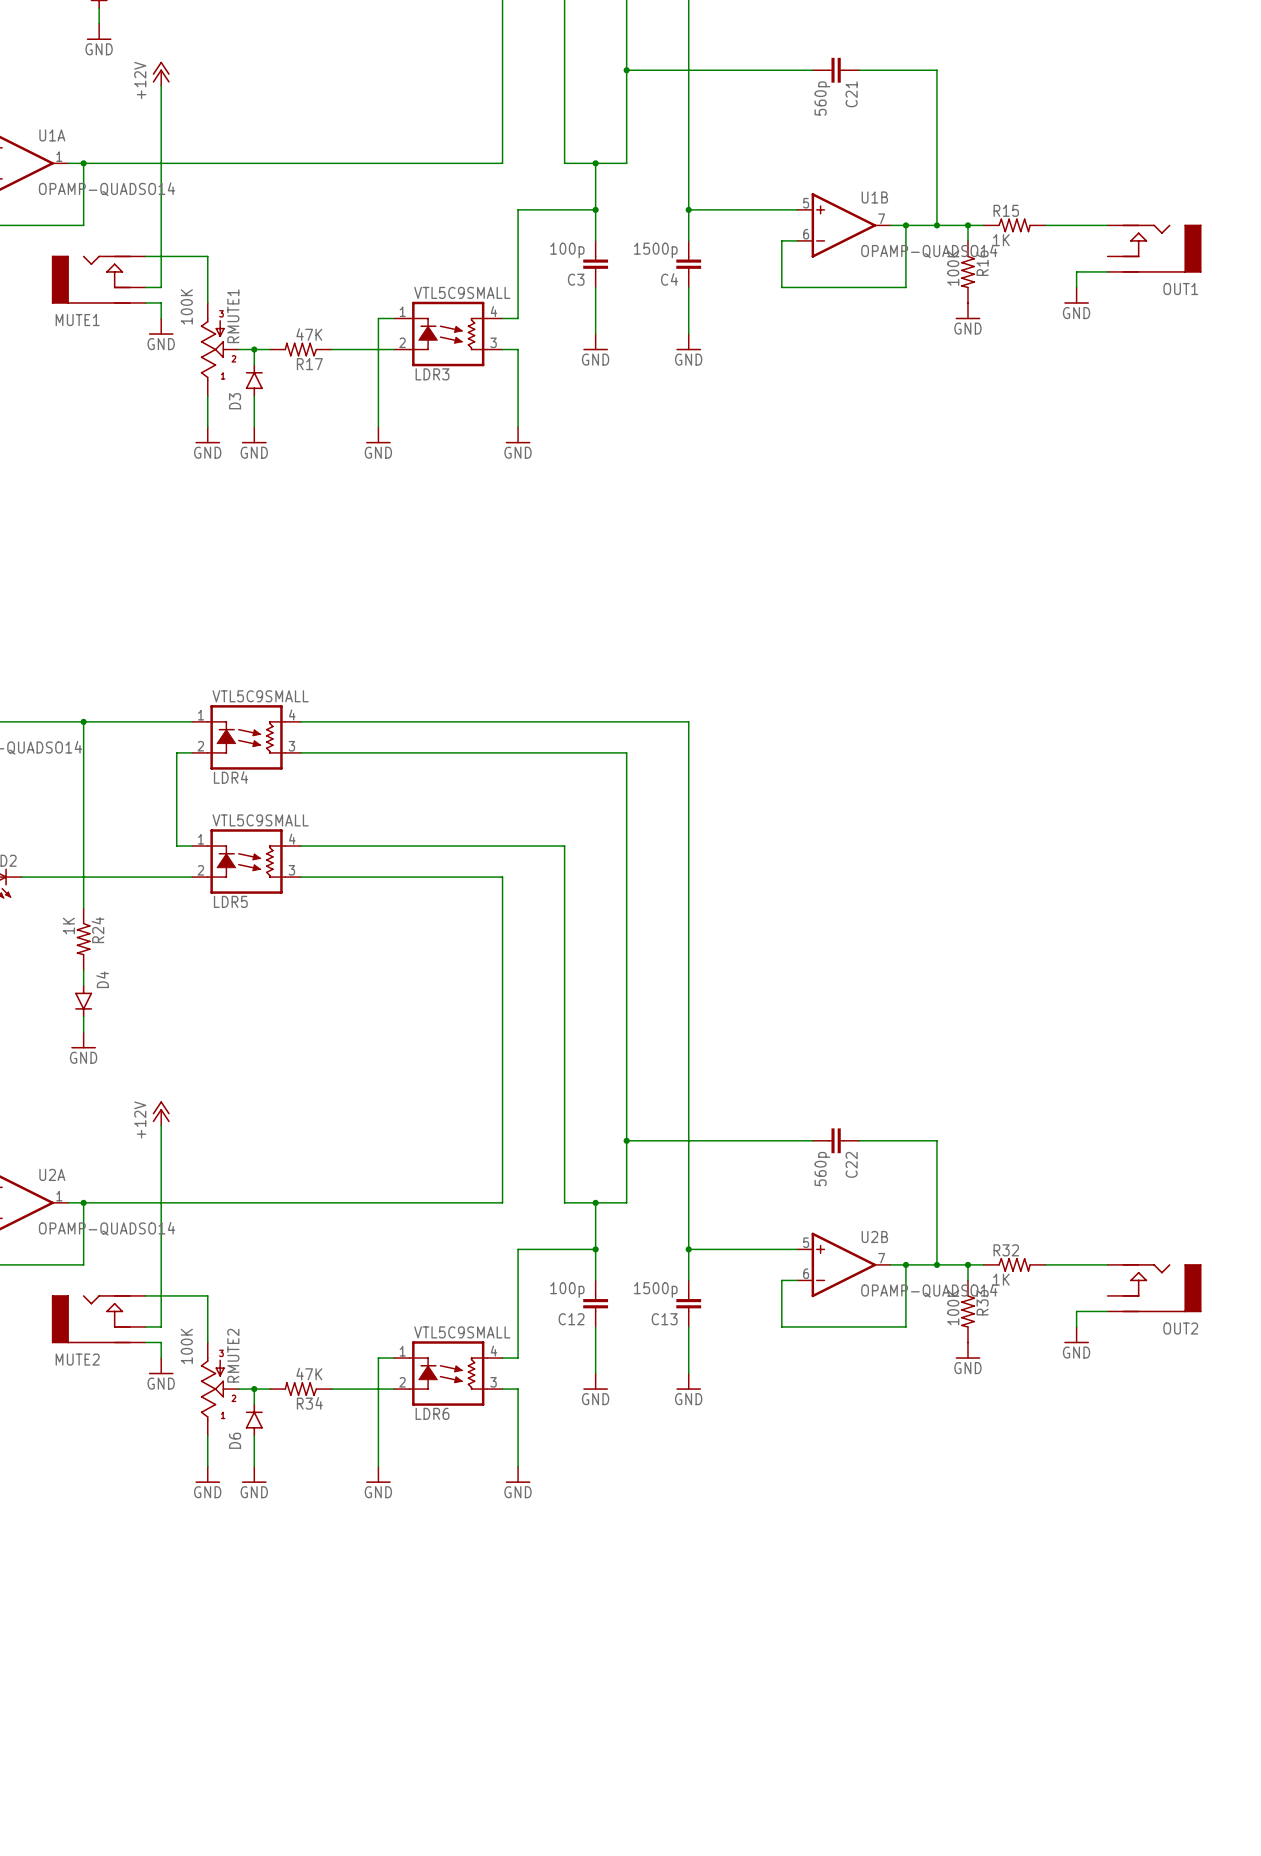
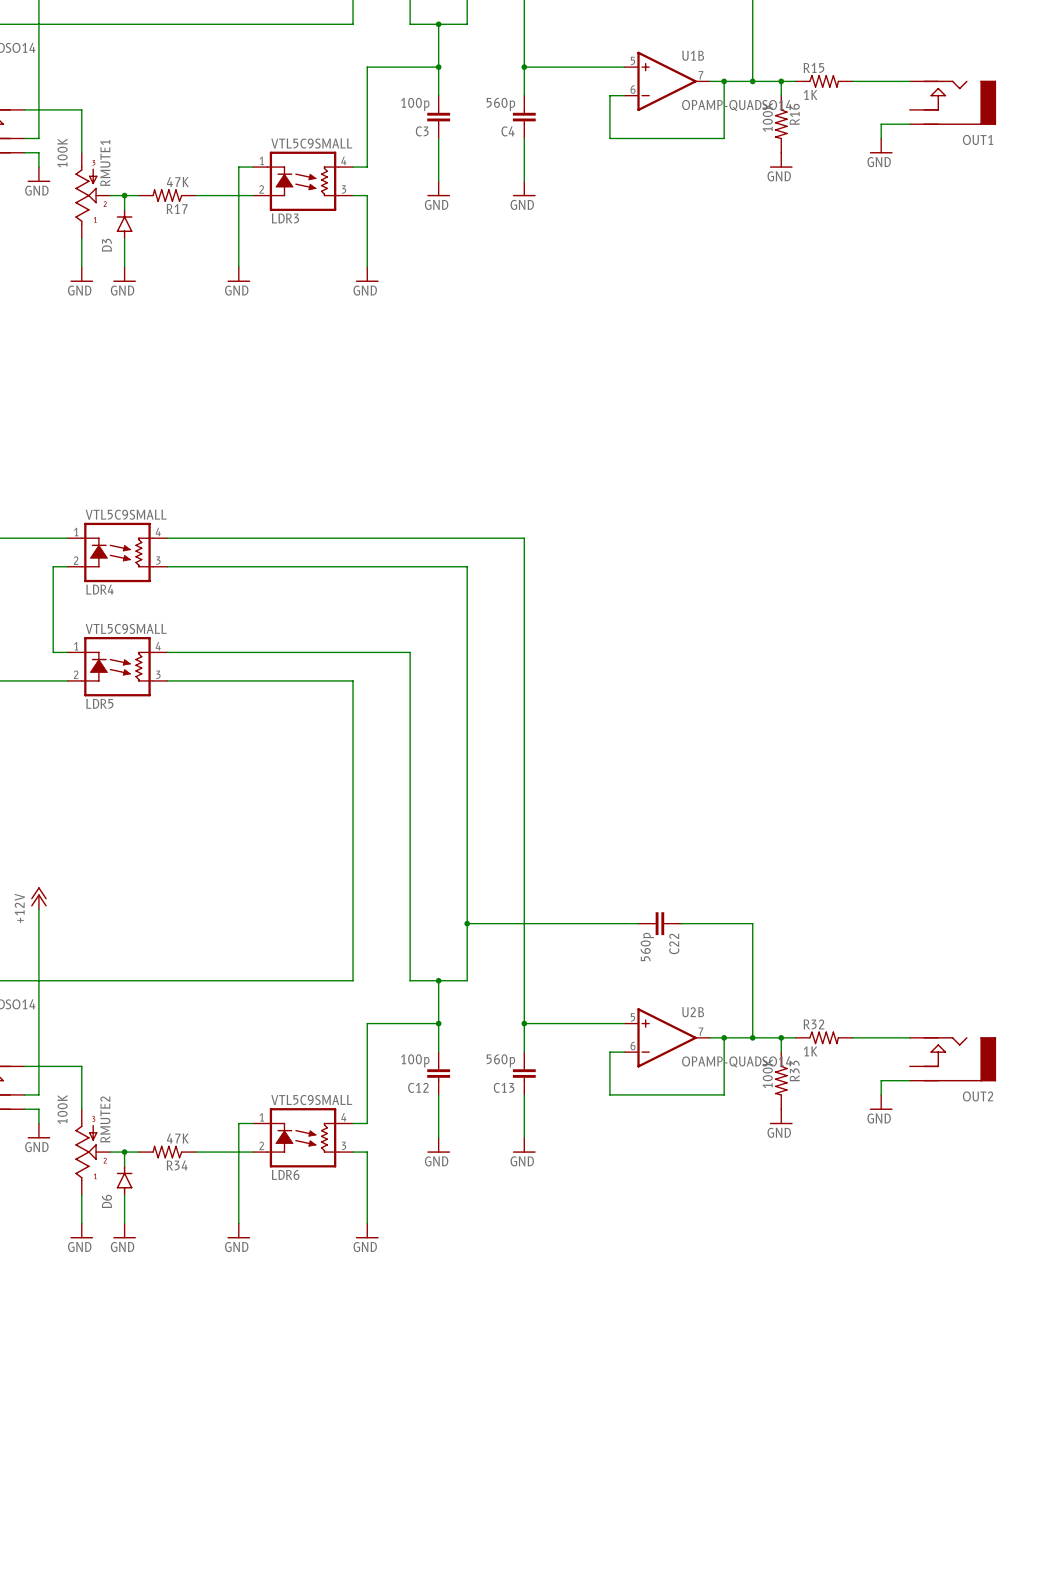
C4 value: 1500p (655, 250) -> 560p (500, 104)
C13 value: 1500p (655, 1290) -> 560p (500, 1060)

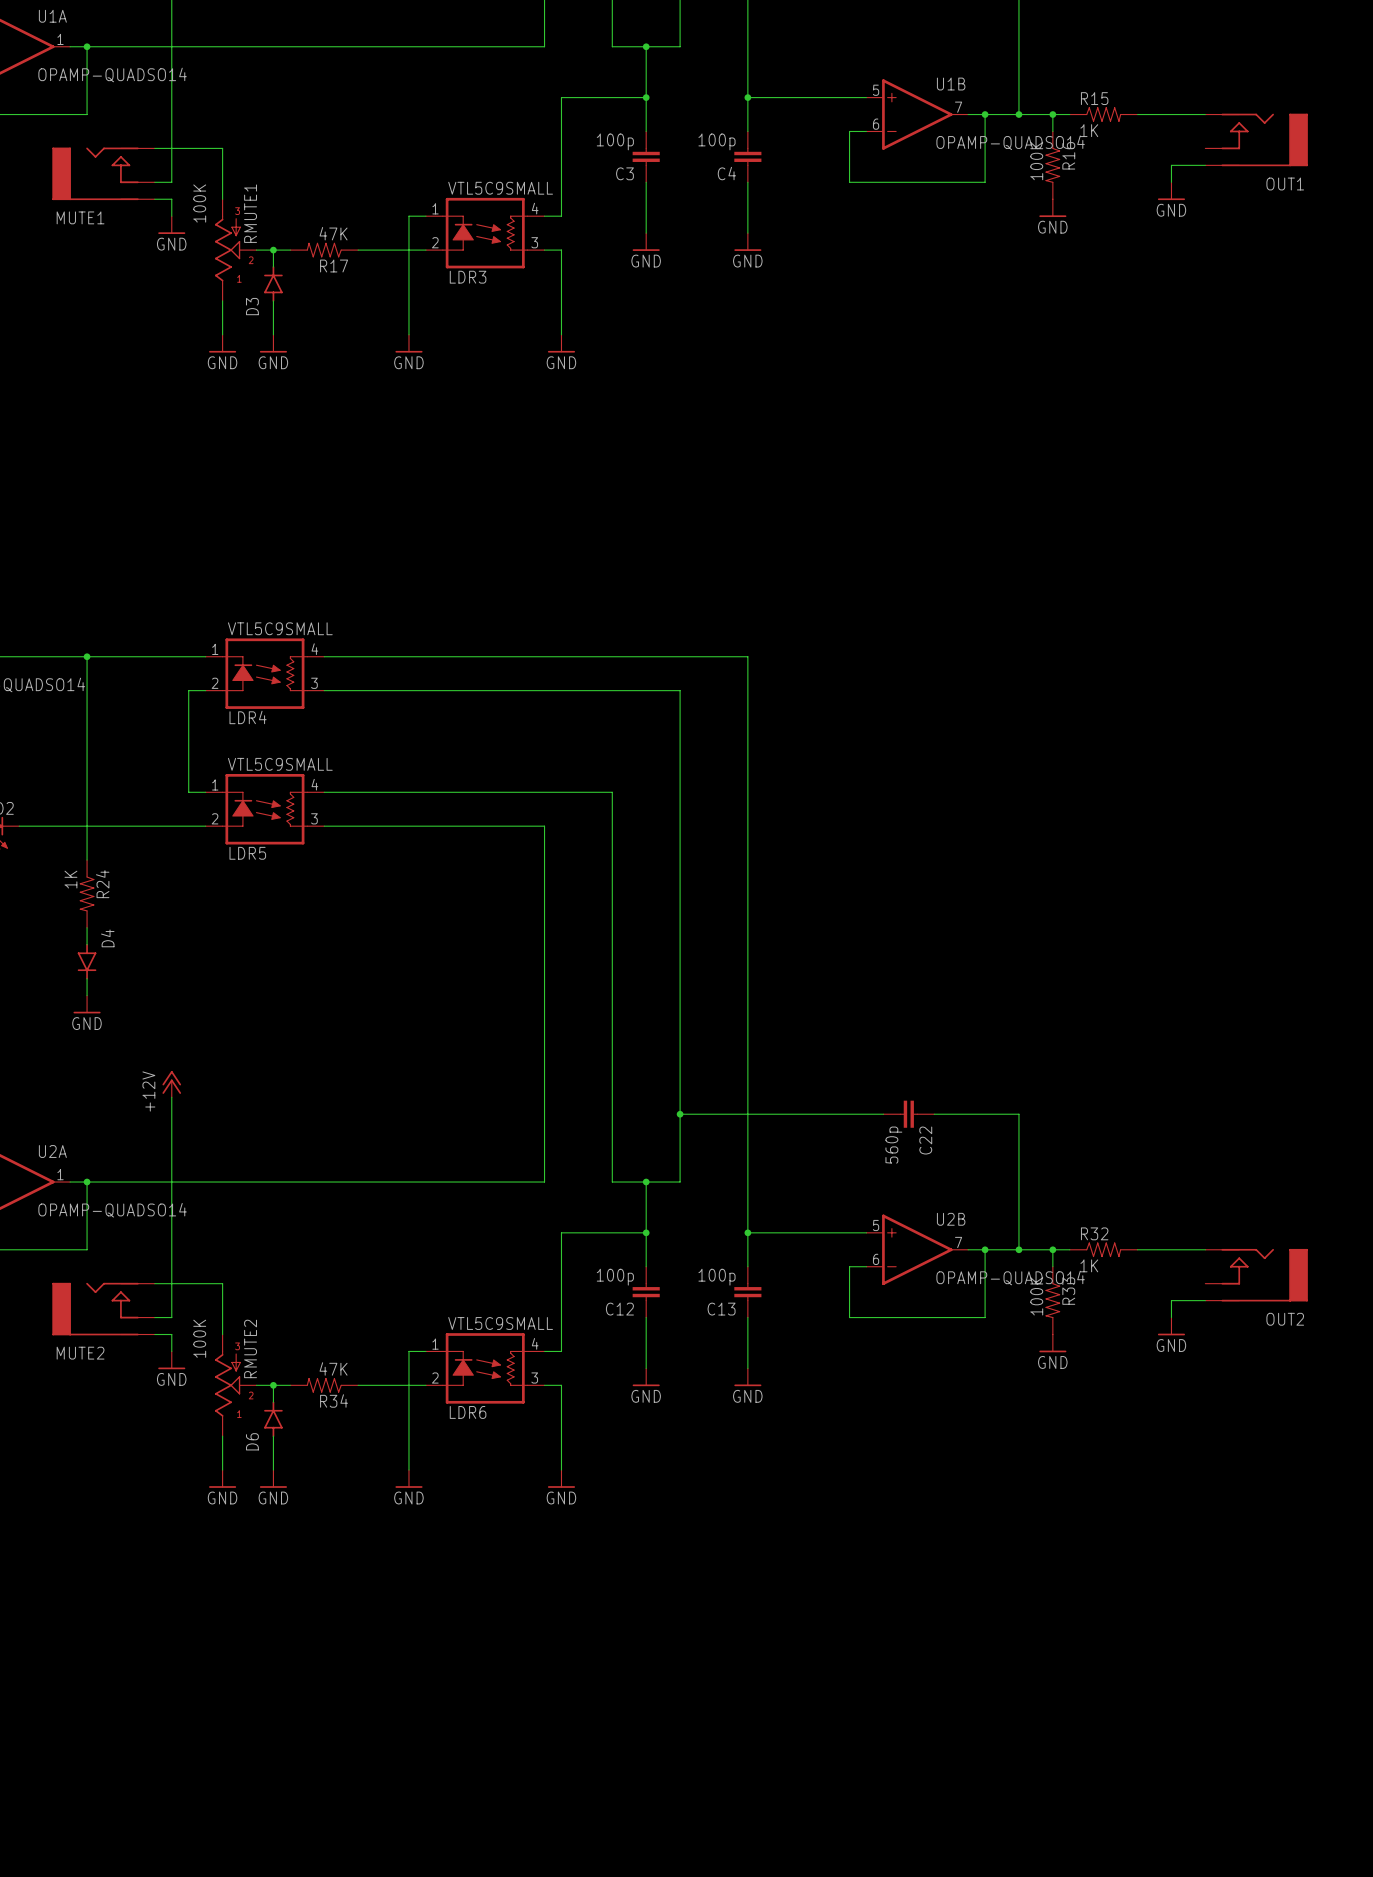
C4 value: 560p (500, 104) -> 100p (716, 141)
C13 value: 560p (500, 1060) -> 100p (716, 1277)

